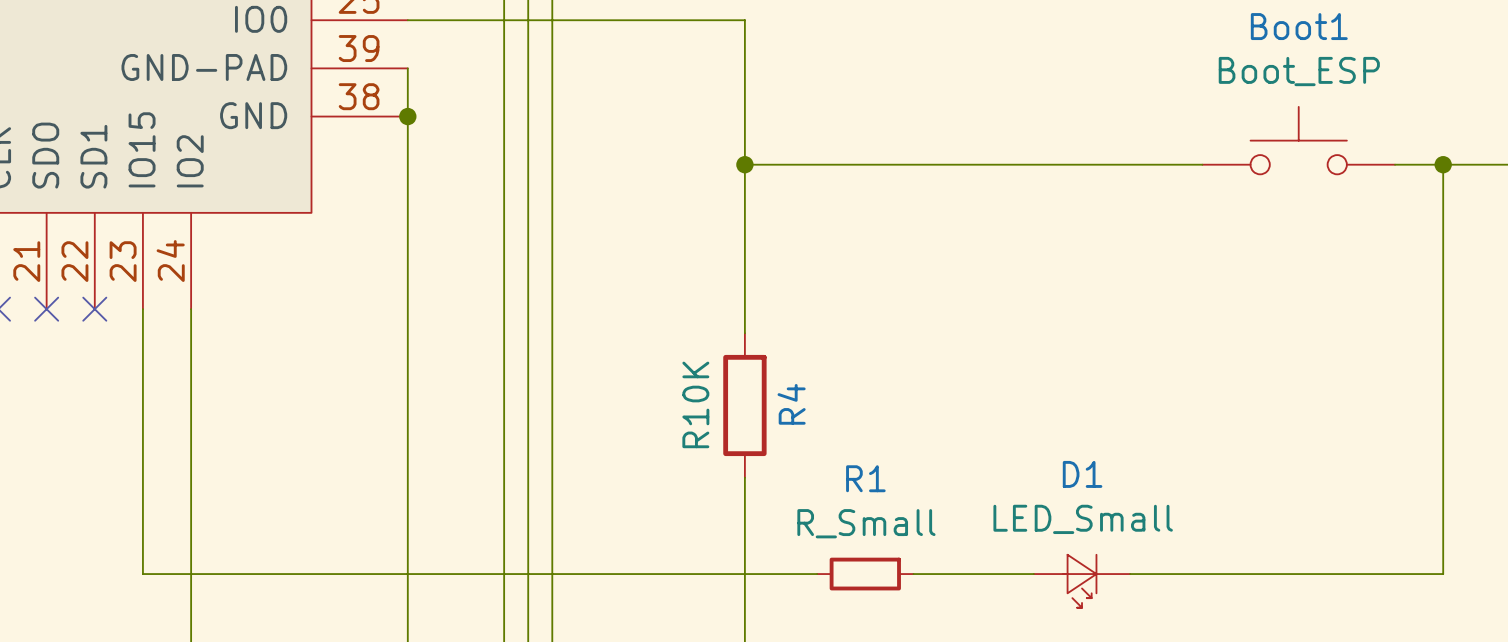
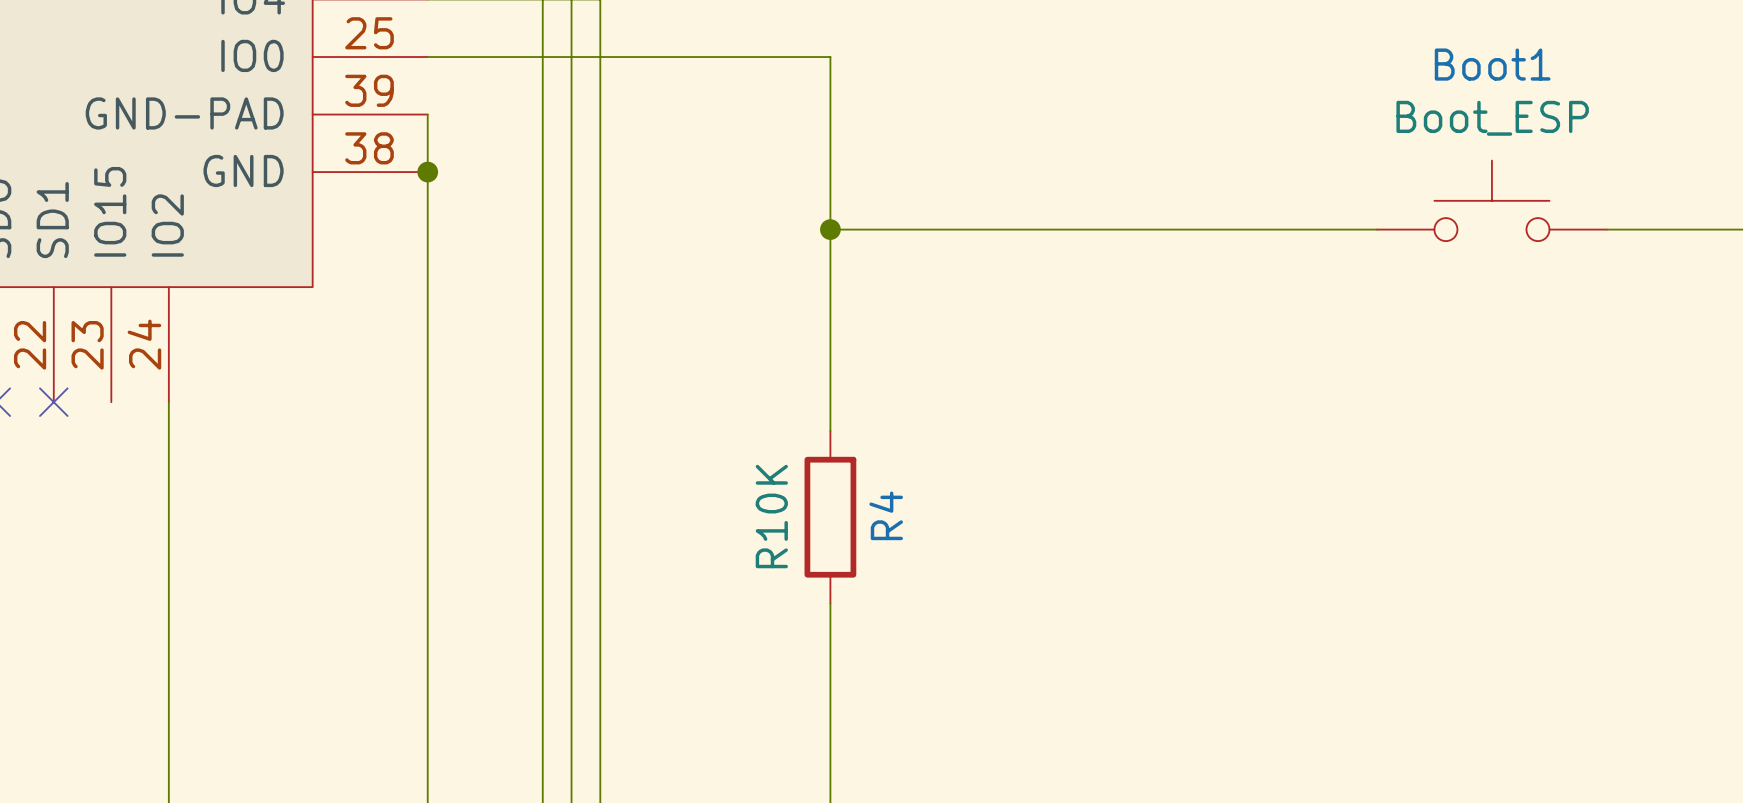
wire: (1443, 164) (1443, 574) (1130, 574) -> none
junction: (1443, 164) -> none
wire: (142, 309) (142, 574) (817, 574) -> none
R1: R_Small (865, 574) -> none
wire: (913, 574) (1033, 574) -> none
D1: LED_Small (1082, 581) -> none

